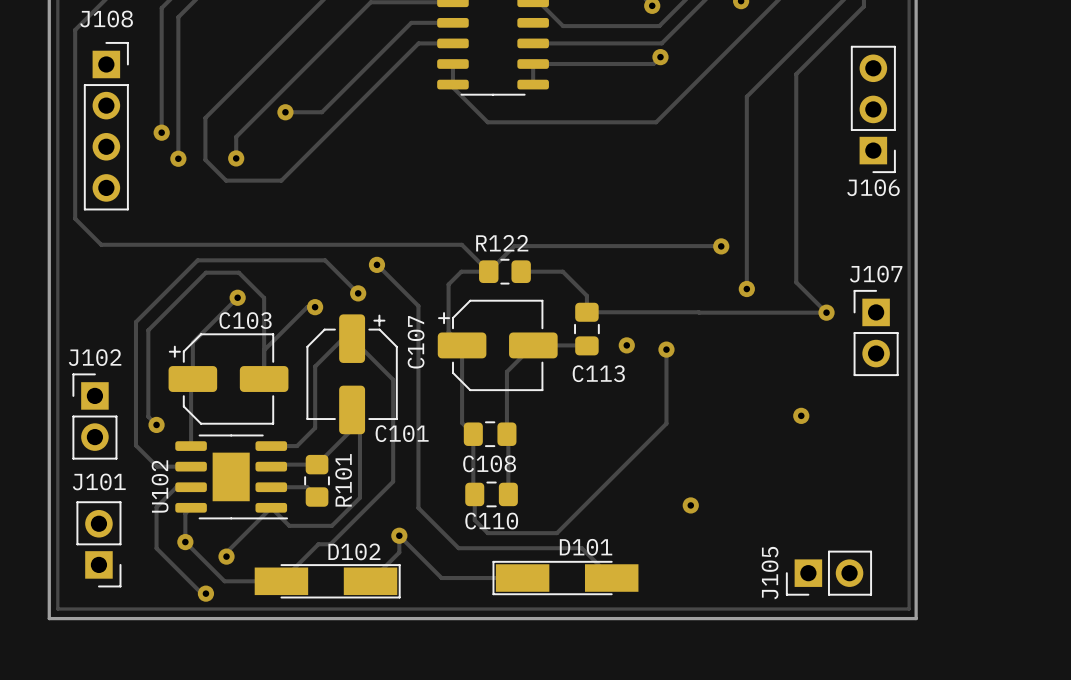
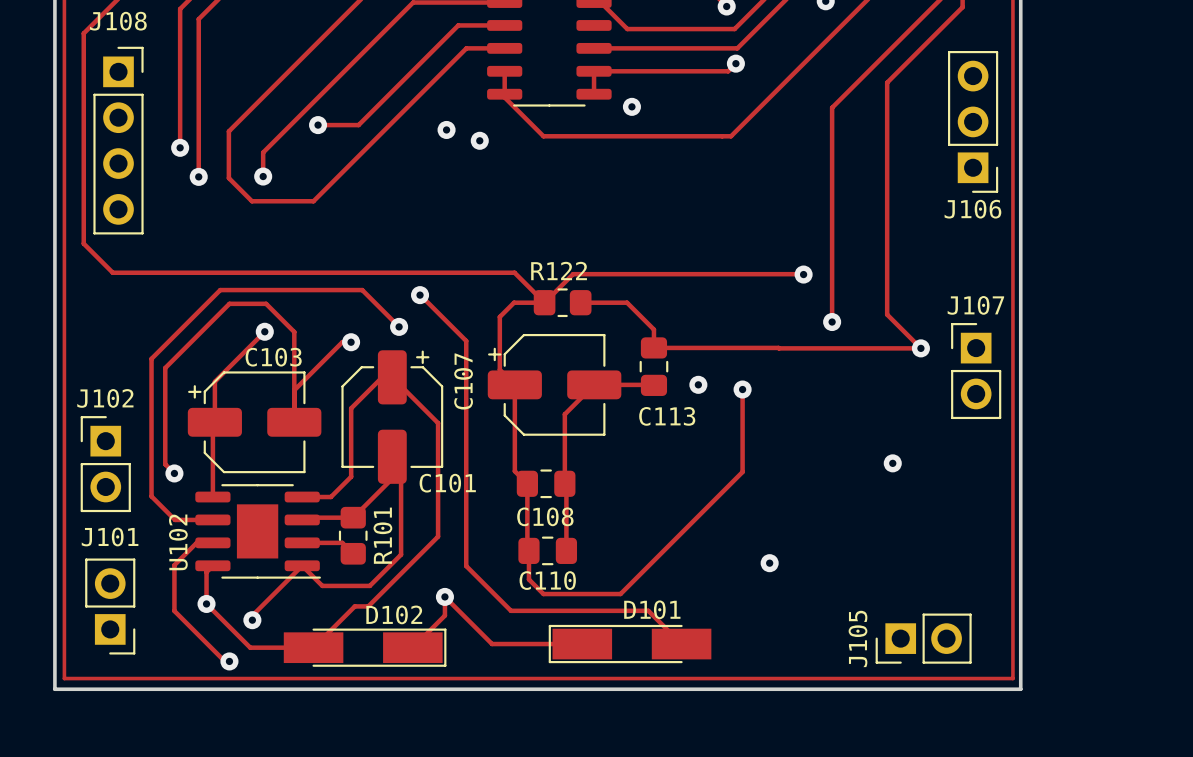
via: none -> (631, 106)
via: none -> (446, 129)
via: none -> (479, 140)

